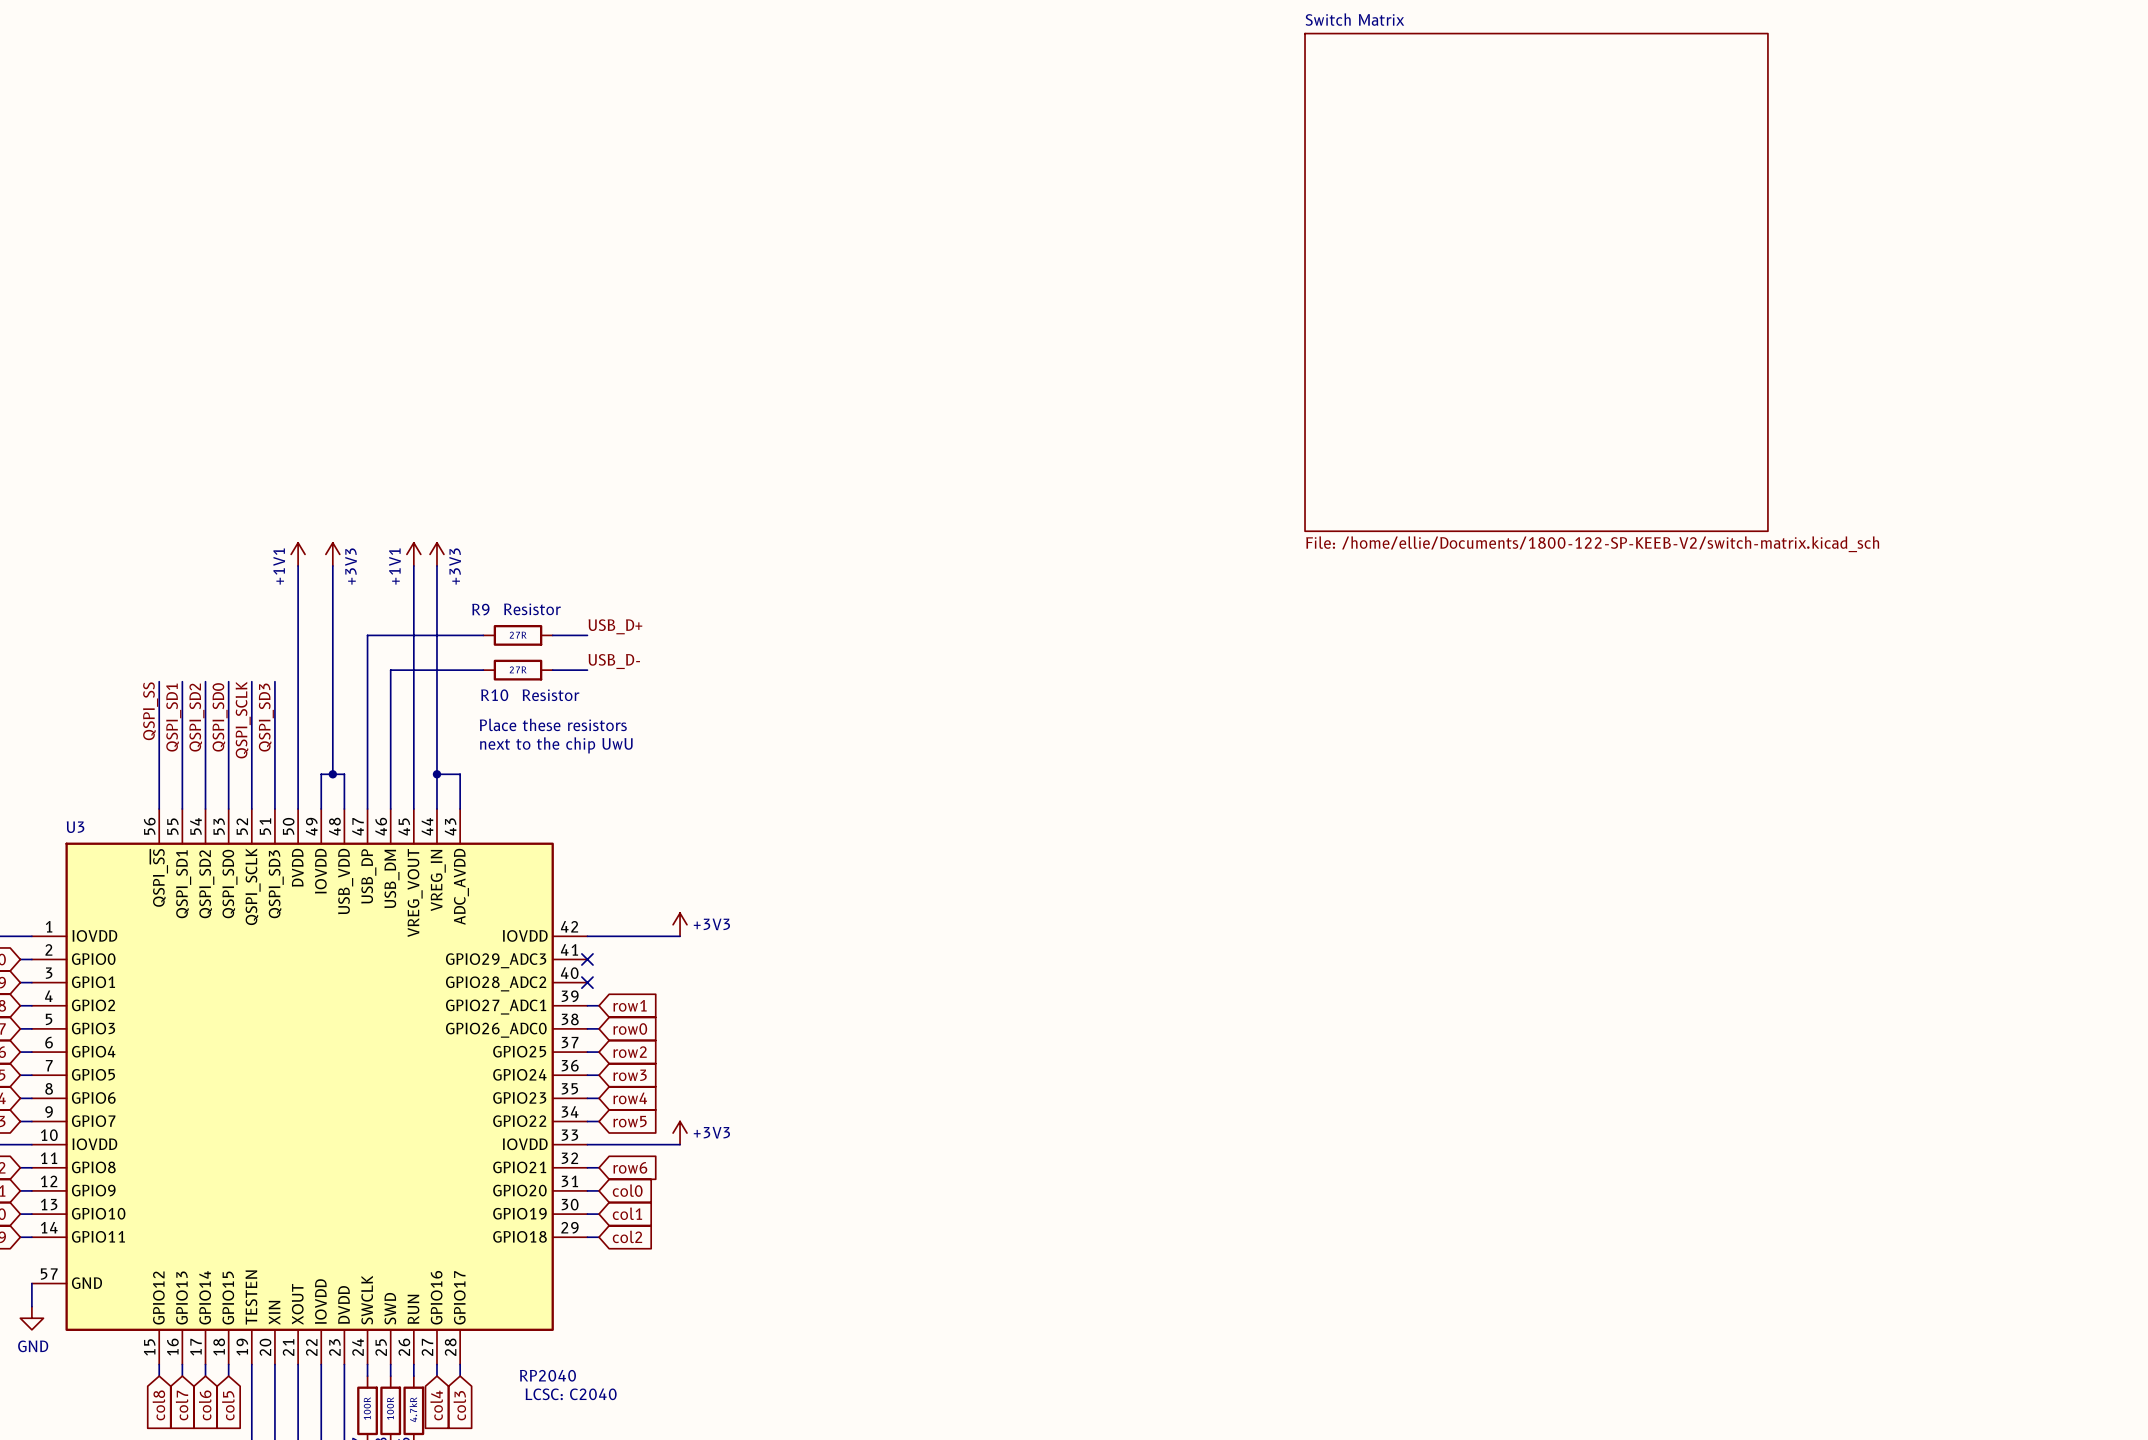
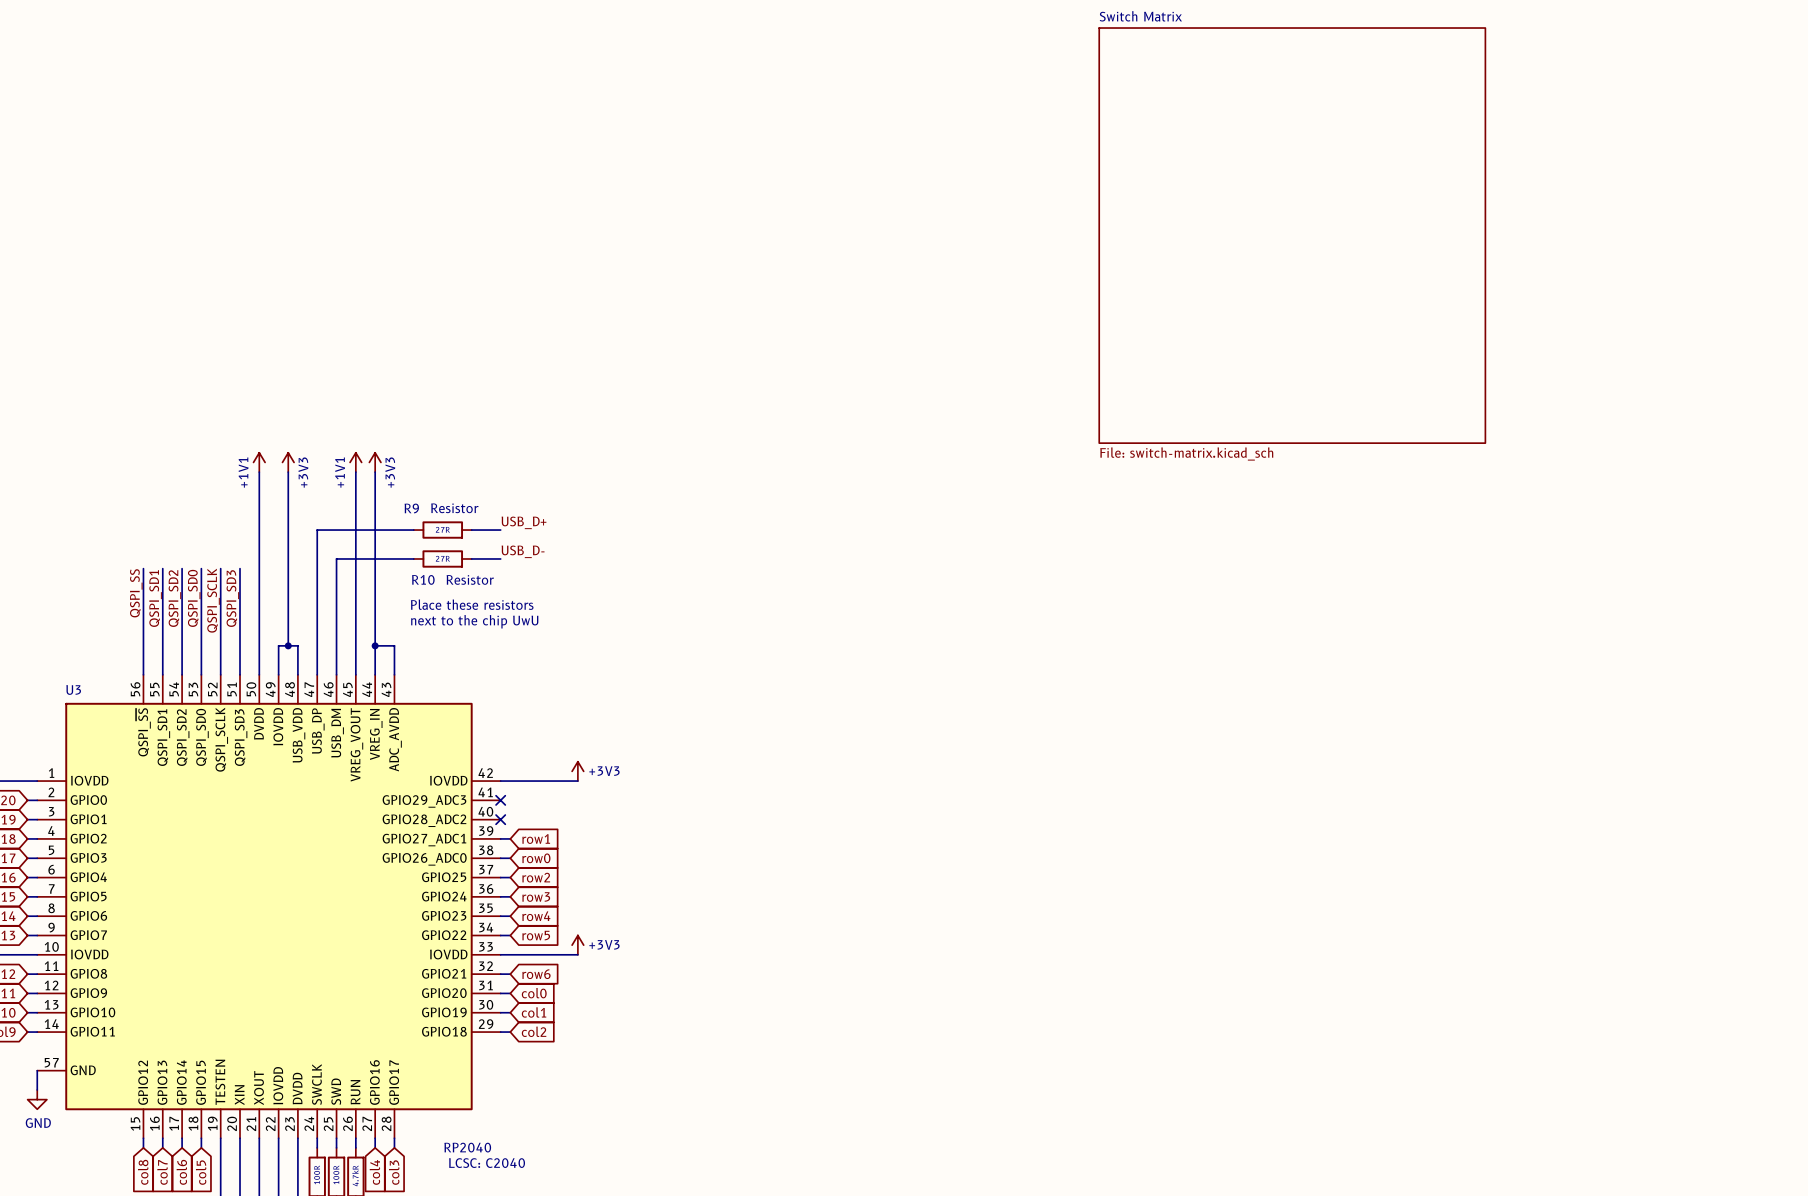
sheet Switch Matrix value: File: /home/ellie/Documents/1800-122-SP-KEEB-V2/switch-matrix.kicad_sch (1592, 544) -> File: switch-matrix.kicad_sch (1186, 453)

